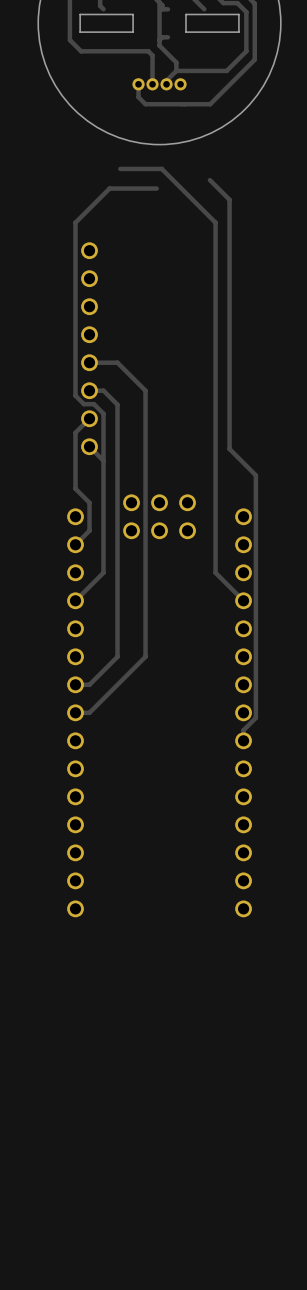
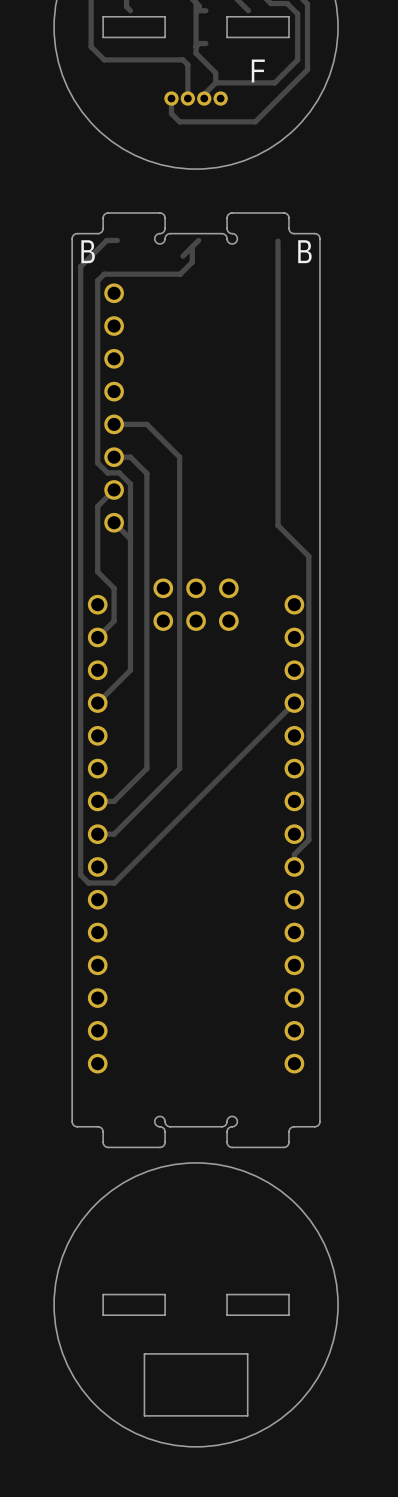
text: none -> F (258, 71)
track: (120, 168) (161, 168) (215, 222) (215, 572) (243, 600) -> (117, 240) (106, 240) (80, 266) (80, 875) (88, 882) (114, 882) (294, 703)
track: (209, 180) (229, 199) (229, 206) -> none
board edge: none -> (283, 212) (229, 213) (227, 217) (227, 229) (237, 238) (236, 241) (232, 243) (228, 242) (225, 235) (221, 233) (169, 233) (166, 235) (163, 242) (157, 243) (155, 240) (155, 236) (163, 232) (165, 228) (164, 216) (159, 212) (106, 213) (103, 216) (101, 232) (76, 233) (72, 238) (72, 1121) (75, 1126) (101, 1127) (103, 1143) (107, 1147) (162, 1146) (165, 1142) (164, 1130) (154, 1122) (155, 1118) (159, 1116) (163, 1117) (166, 1124) (170, 1126) (222, 1126) (225, 1124) (229, 1117) (234, 1116) (236, 1119) (236, 1123) (229, 1127) (227, 1131) (227, 1143) (232, 1147) (285, 1147) (288, 1143) (291, 1127) (315, 1126) (319, 1122) (319, 238) (316, 233) (291, 232) (288, 216) (283, 212)
track: (156, 188) (109, 188) (75, 222) (75, 239) -> (192, 246) (192, 262) (180, 274) (104, 274) (97, 280)
track: none -> (198, 240) (182, 256)
text: none -> B (88, 251)
text: none -> B (304, 251)
round board edge: none -> [53, 1162, 339, 1447]
board edge: none -> (165, 1294) (165, 1315) (103, 1315) (103, 1294) (165, 1294)
board edge: none -> (288, 1294) (288, 1315) (227, 1315) (227, 1294) (288, 1294)
board edge: none -> (247, 1353) (144, 1353) (144, 1415) (247, 1415) (247, 1353)

